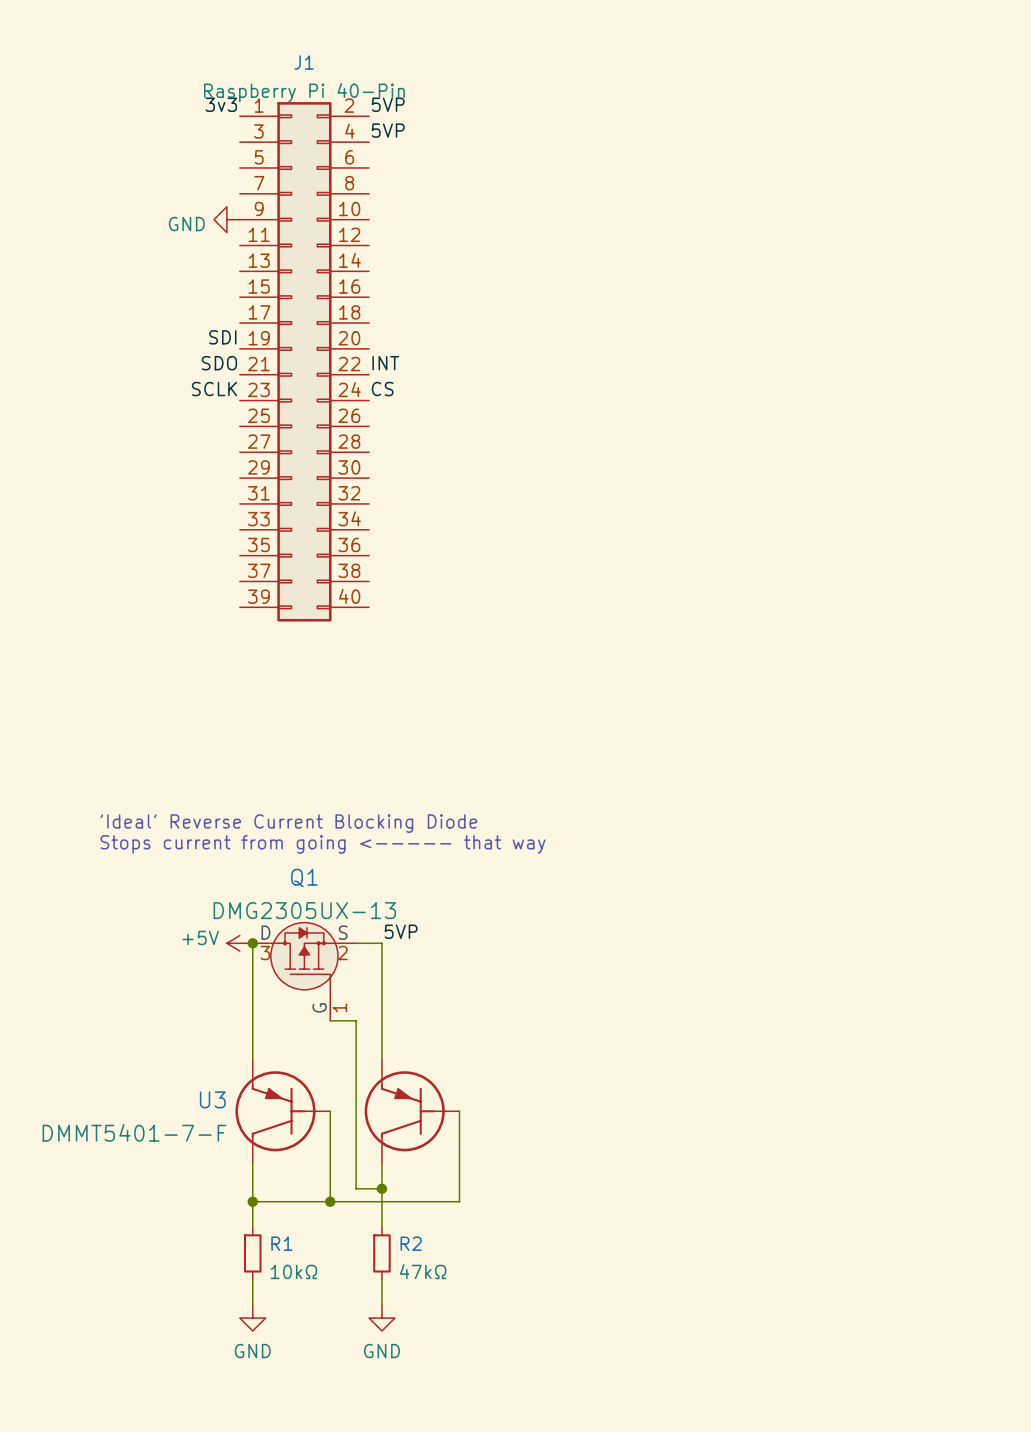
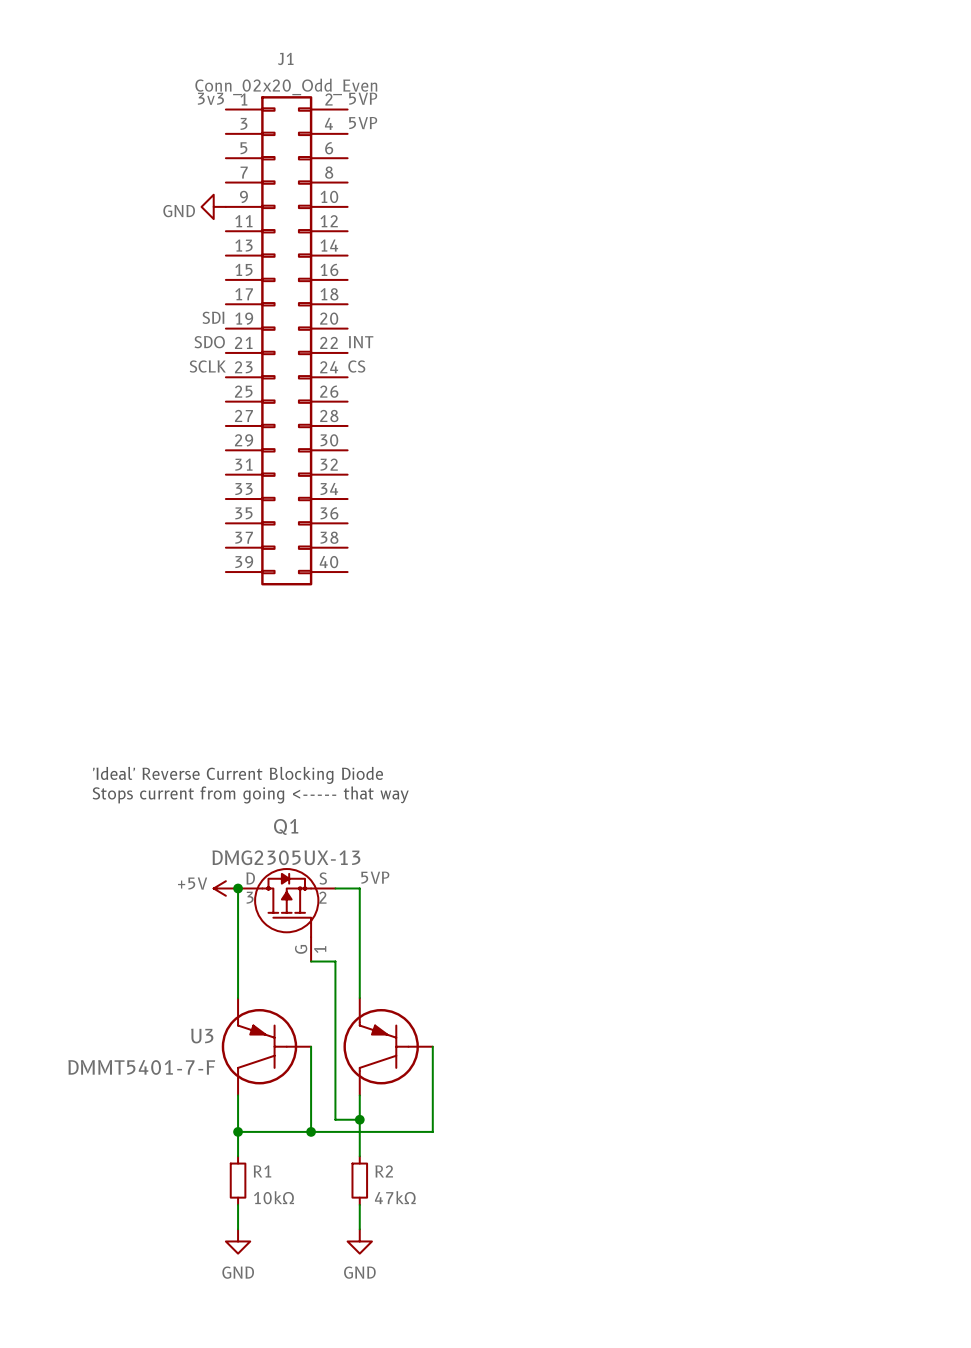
J1 value: Raspberry Pi 40-Pin (304, 92) -> Conn_02x20_Odd_Even (286, 86)

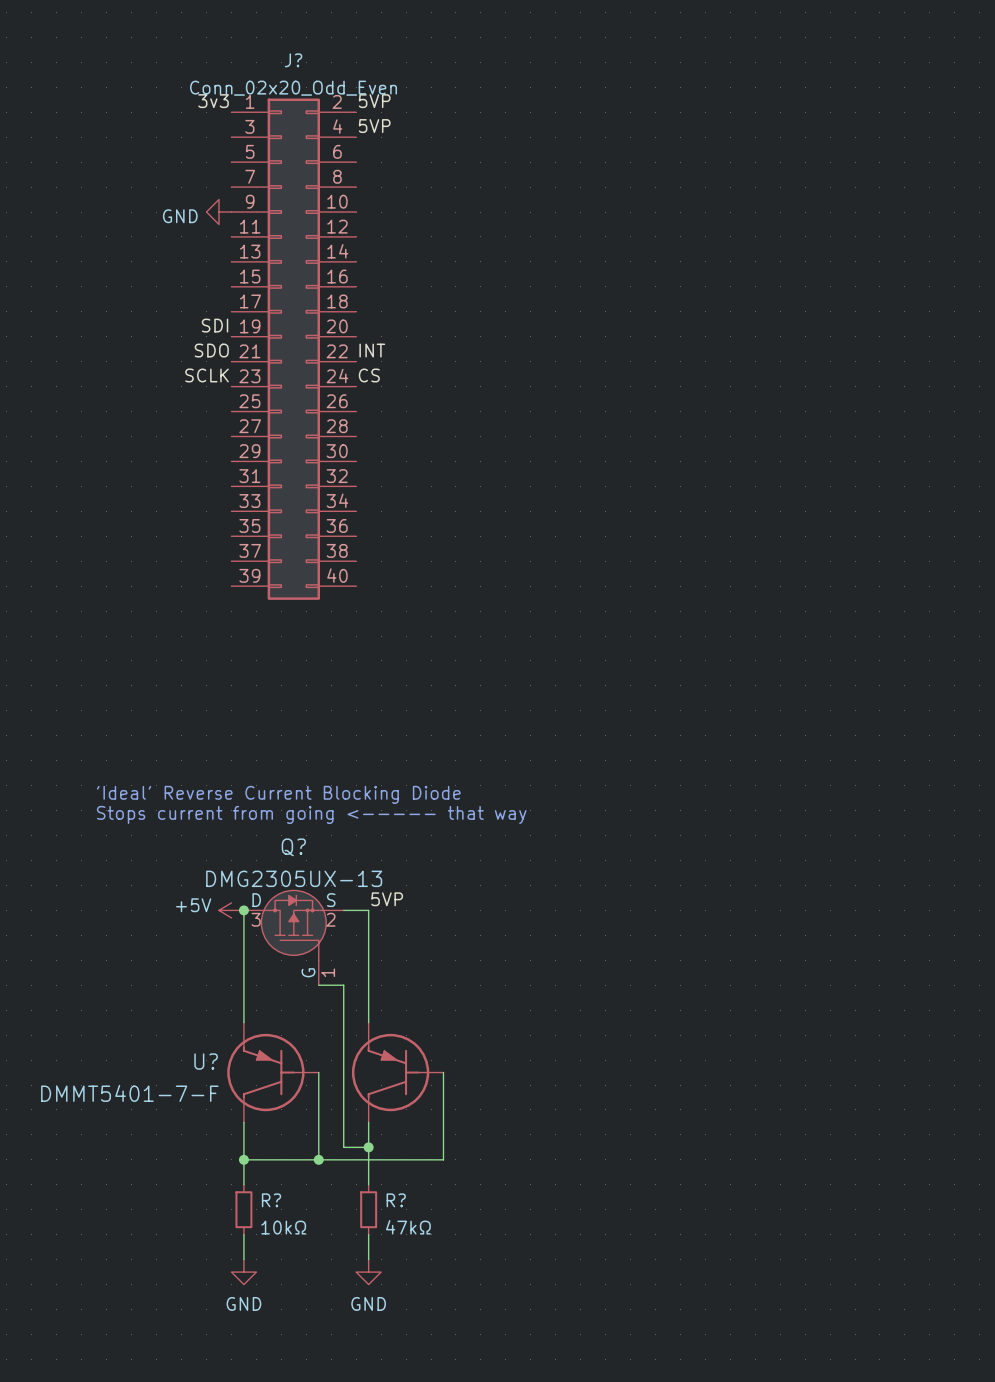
J1 name: J1 (285, 58) -> J? (293, 60)
Q1 name: Q1 (286, 826) -> Q? (293, 847)
U3 name: U3 (202, 1036) -> U? (206, 1061)
R1 name: R1 (262, 1171) -> R? (271, 1200)
R2 name: R2 (384, 1171) -> R? (396, 1200)

